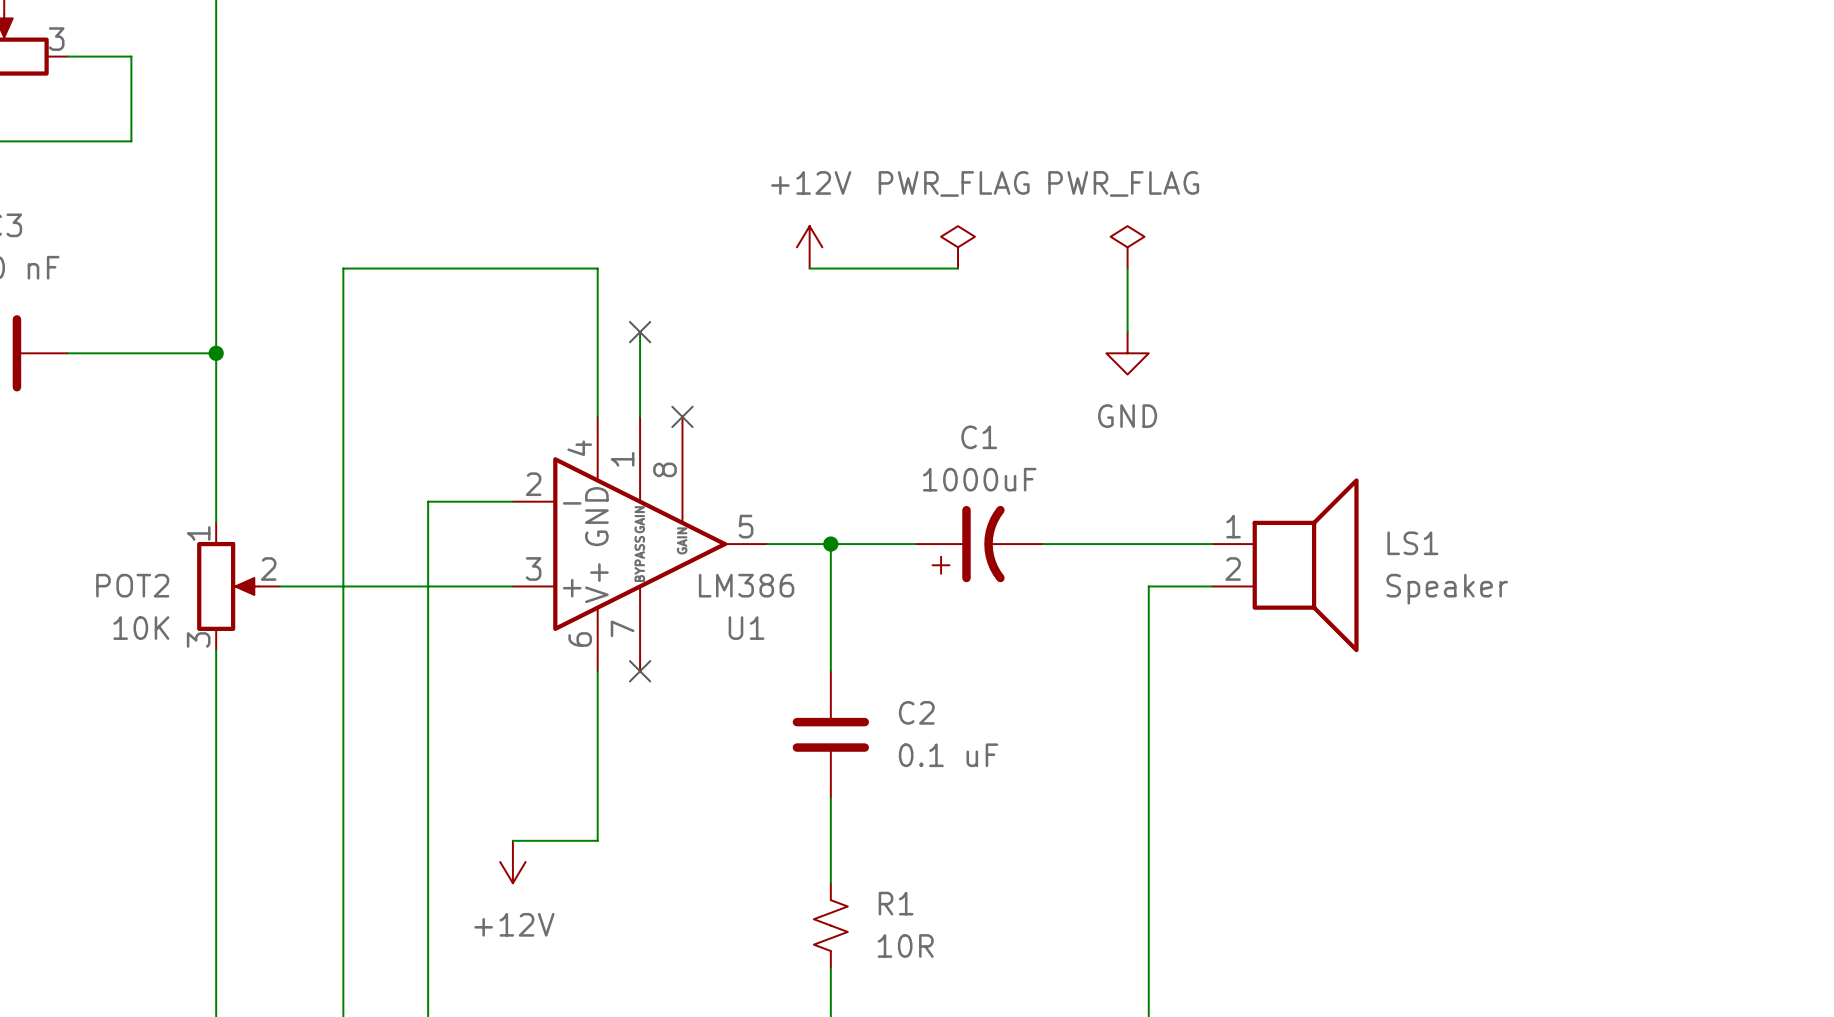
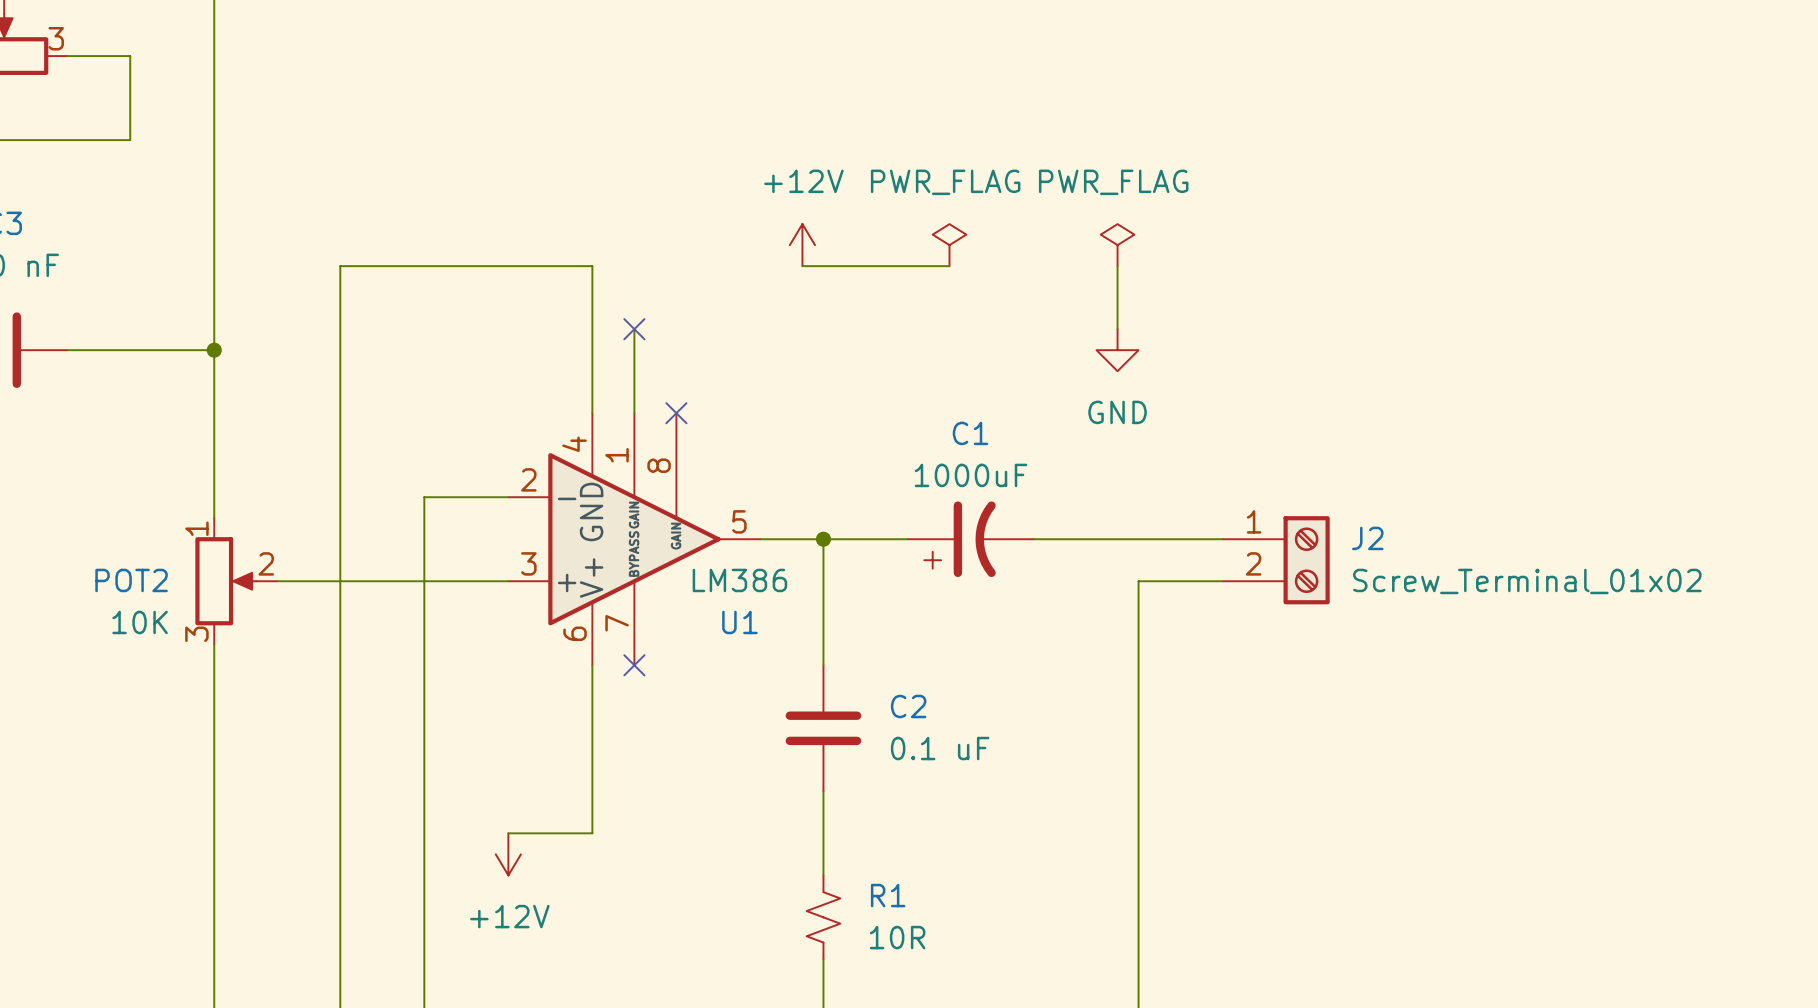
LS1: Speaker (1285, 565) -> none
J2: none -> Screw_Terminal_01x02 (1276, 560)

